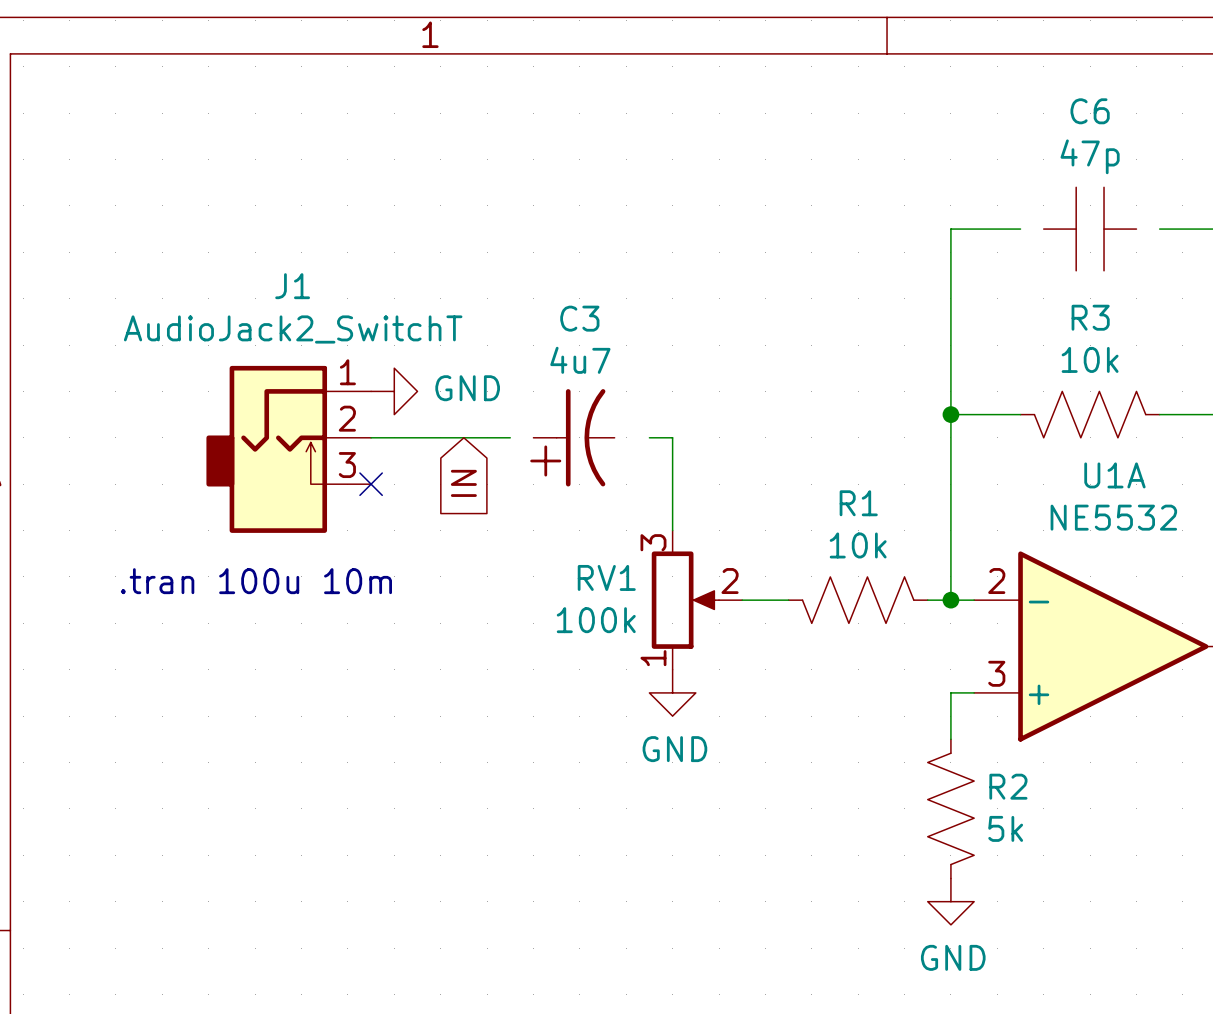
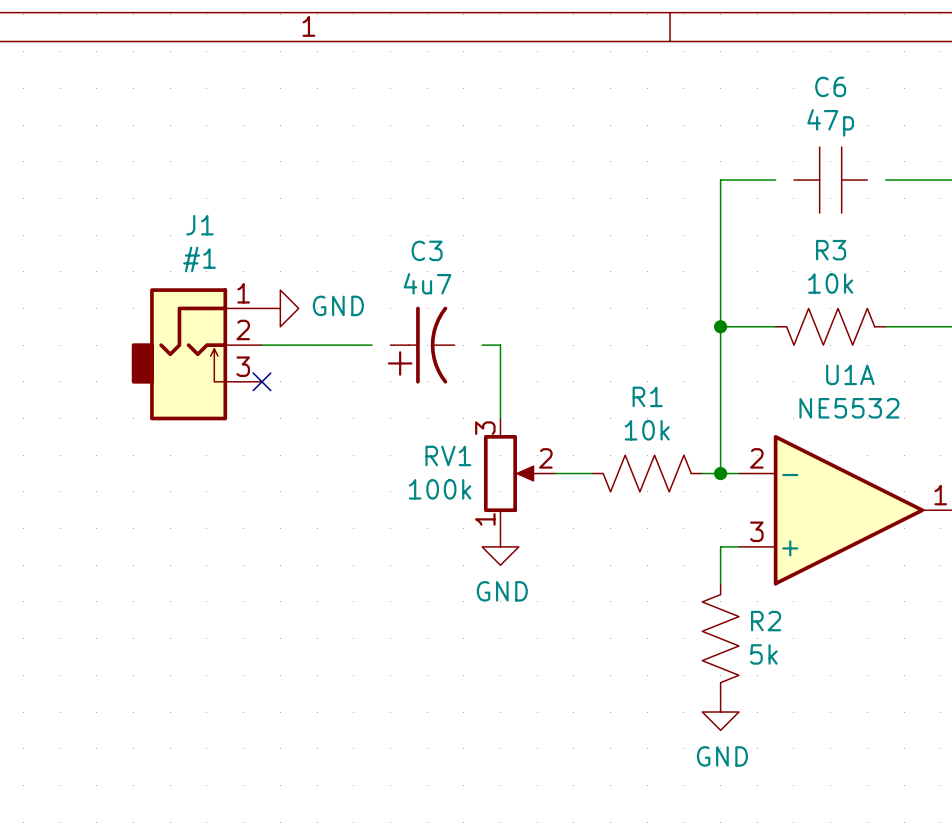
J1 value: AudioJack2_SwitchT (293, 329) -> #1 (199, 259)
global label: IN (463, 483) -> none
text: .tran 100u 10m (256, 581) -> none

